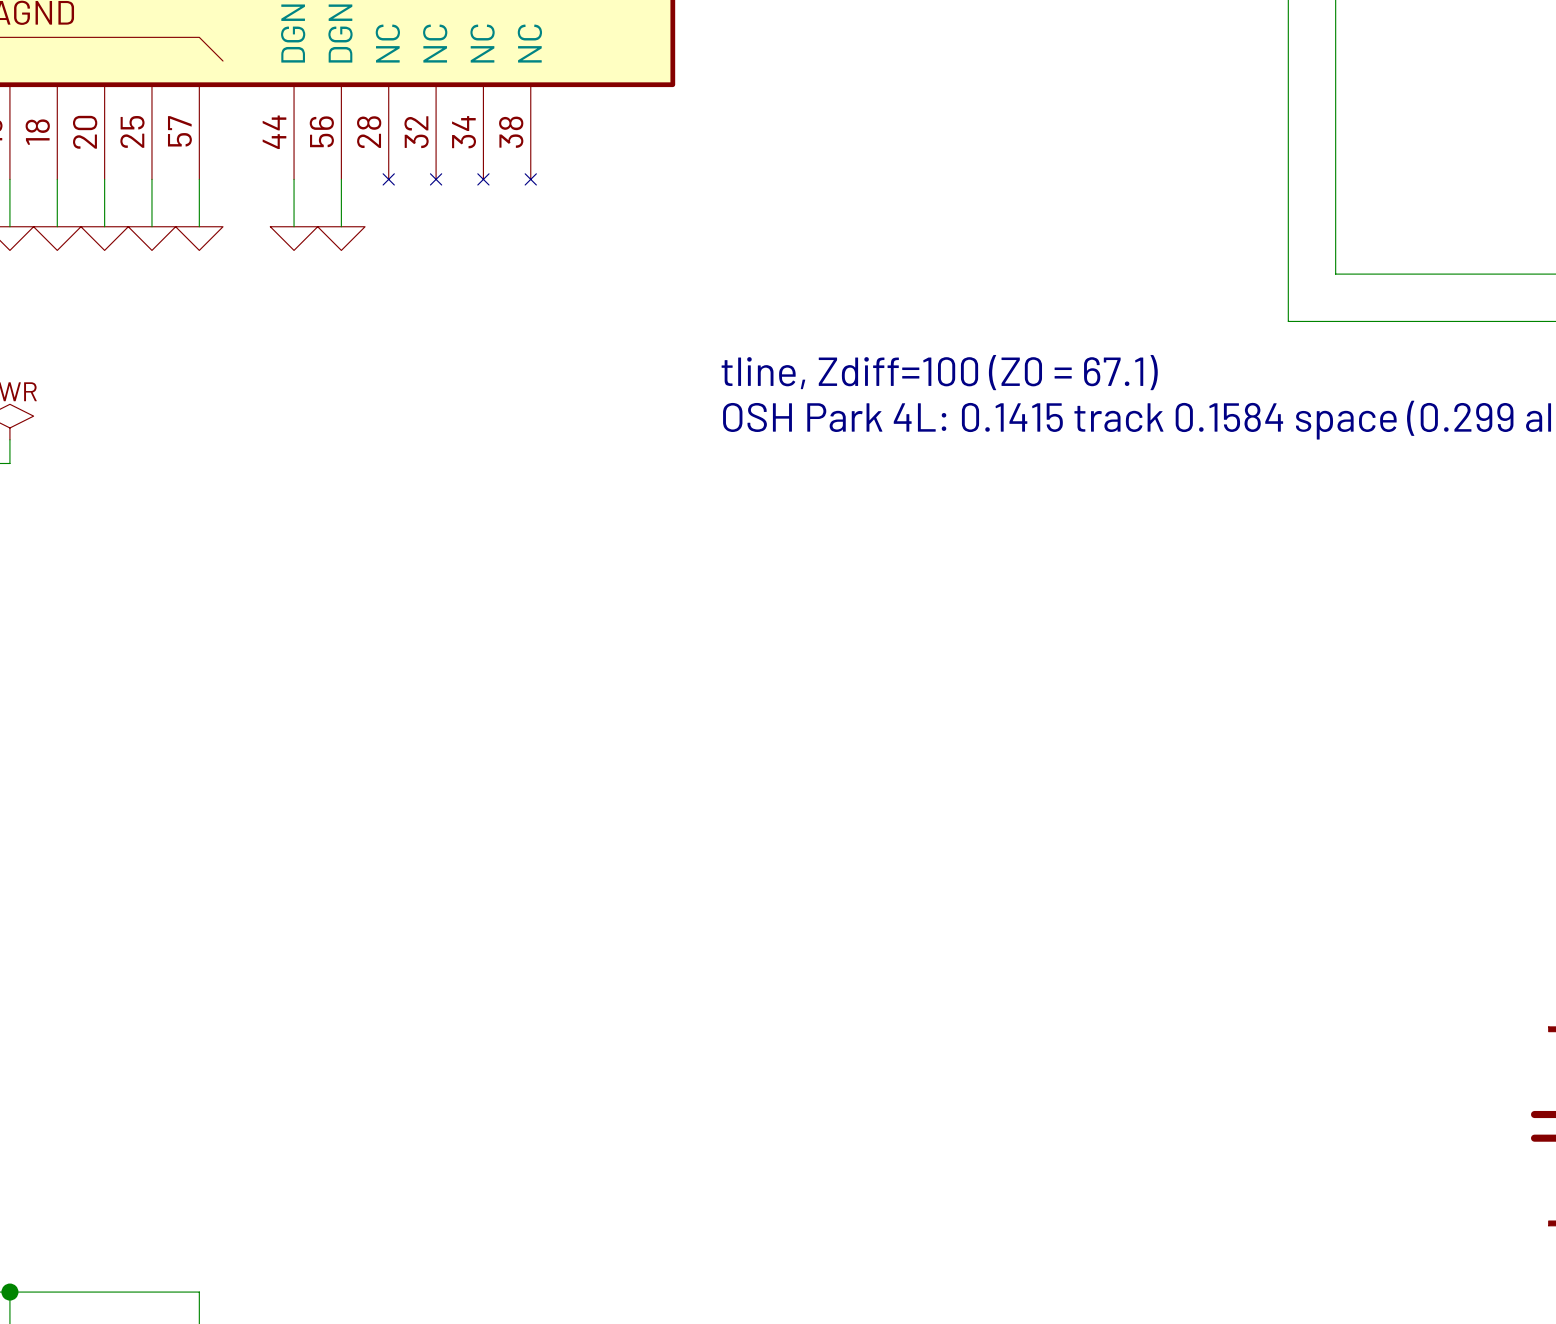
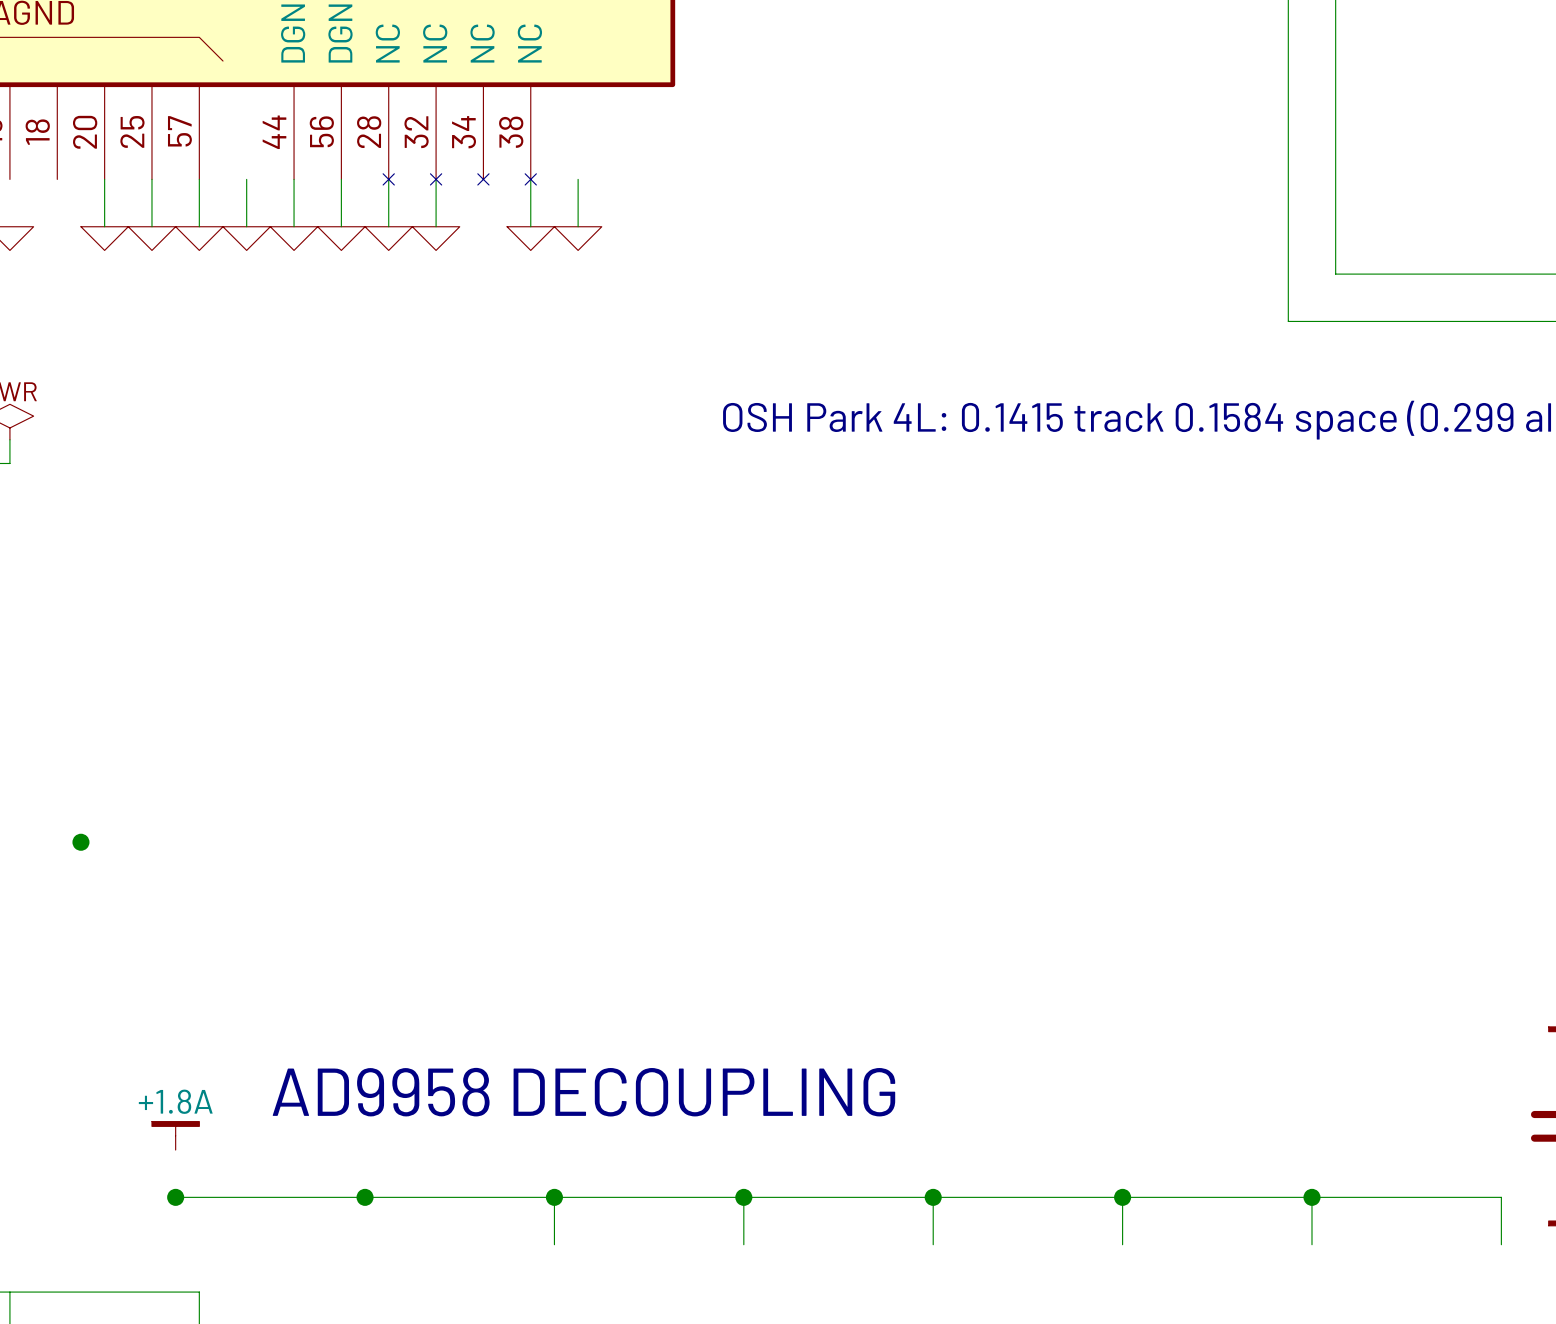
wire: (9, 179) (9, 226) -> (246, 179) (246, 226)
wire: (57, 179) (57, 226) -> (388, 179) (388, 226)
wire: none -> (436, 179) (436, 226)
wire: none -> (530, 179) (530, 226)
wire: none -> (578, 179) (578, 226)
power symbol: (57, 238) -> none
power symbol: none -> (246, 238)
power symbol: none -> (388, 238)
power symbol: none -> (436, 238)
power symbol: none -> (530, 238)
power symbol: none -> (578, 238)
text: tline, Zdiff=100 (Z0 = 67.1) (939, 372) -> none
junction: none -> (80, 842)
text: none -> AD9958 DECOUPLING (583, 1092)
power symbol: none -> +1.8A (175, 1135)
wire: none -> (175, 1197) (1501, 1197) (1501, 1244)
junction: none -> (175, 1197)
junction: none -> (365, 1197)
wire: none -> (554, 1197) (554, 1244)
junction: none -> (554, 1197)
wire: none -> (743, 1197) (743, 1244)
junction: none -> (743, 1197)
wire: none -> (933, 1197) (933, 1244)
junction: none -> (933, 1197)
wire: none -> (1122, 1197) (1122, 1244)
junction: none -> (1122, 1197)
wire: none -> (1311, 1197) (1311, 1244)
junction: none -> (1311, 1197)
junction: (9, 1292) -> none

